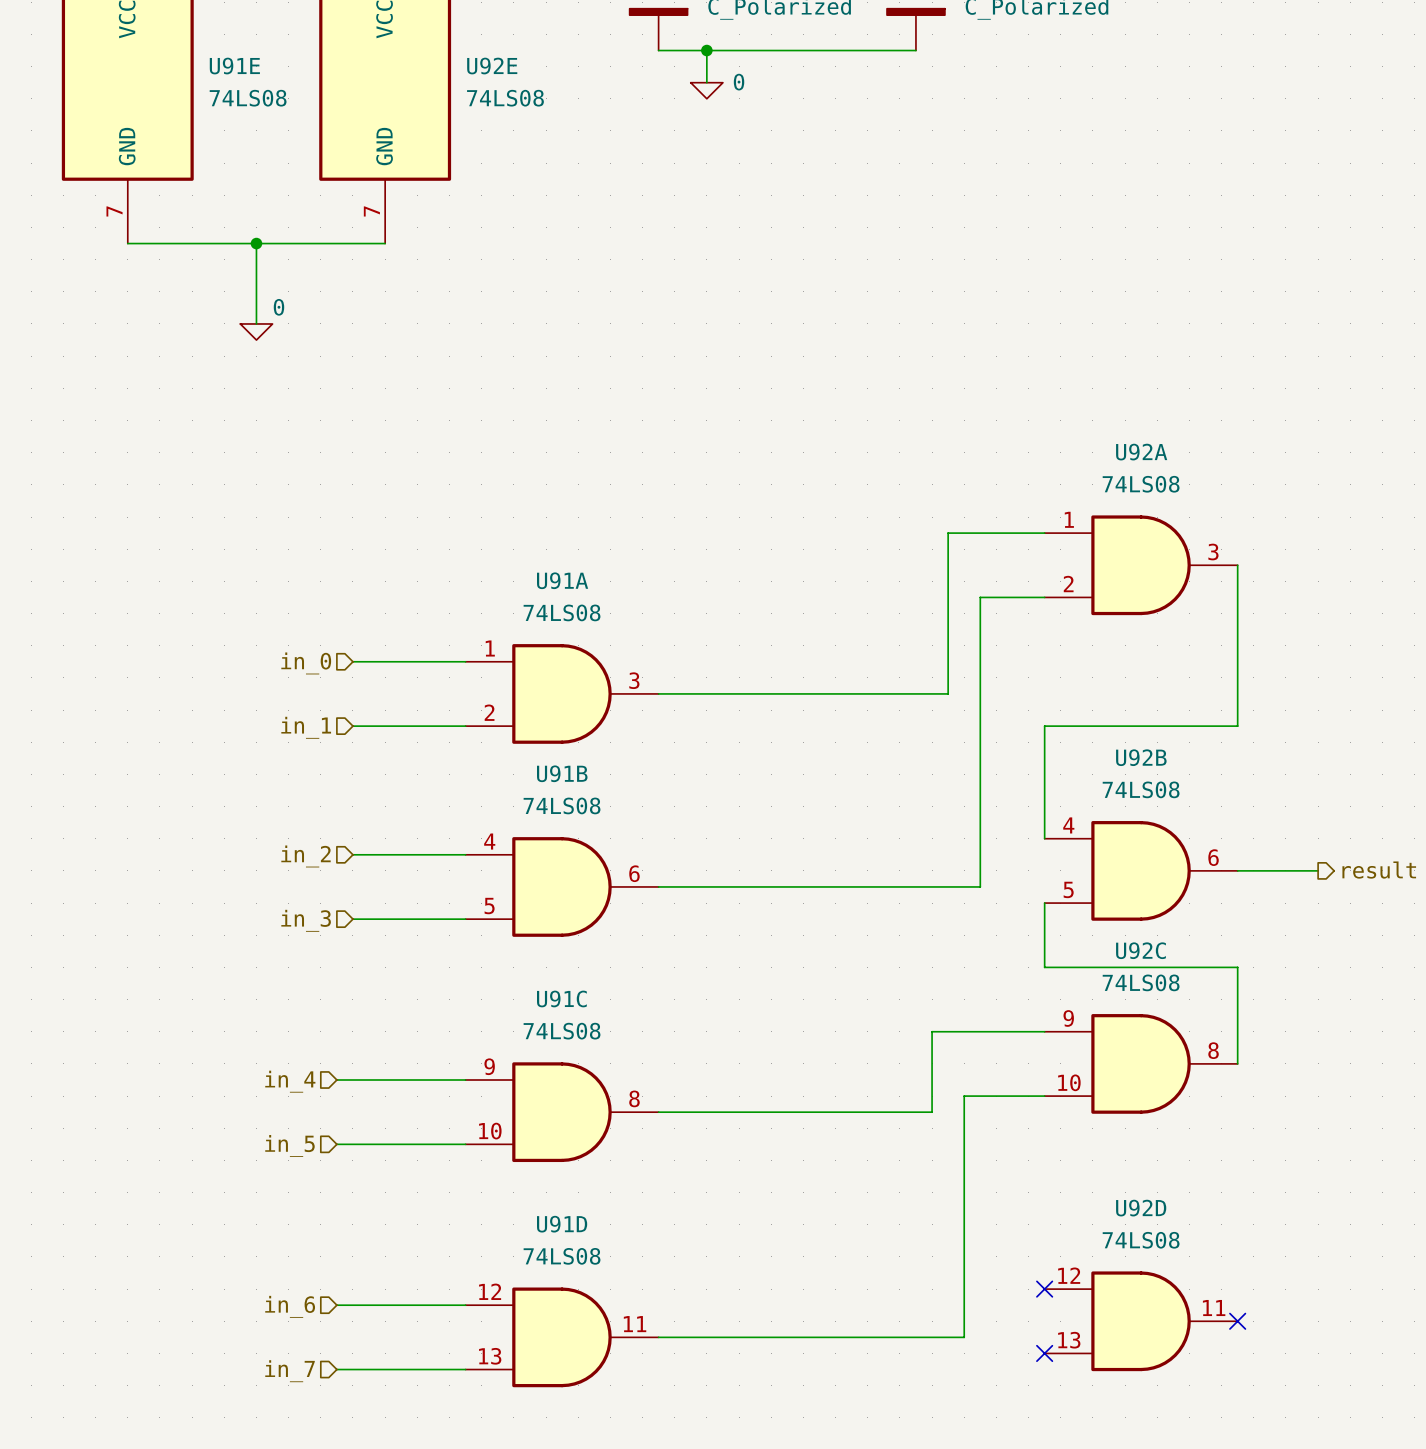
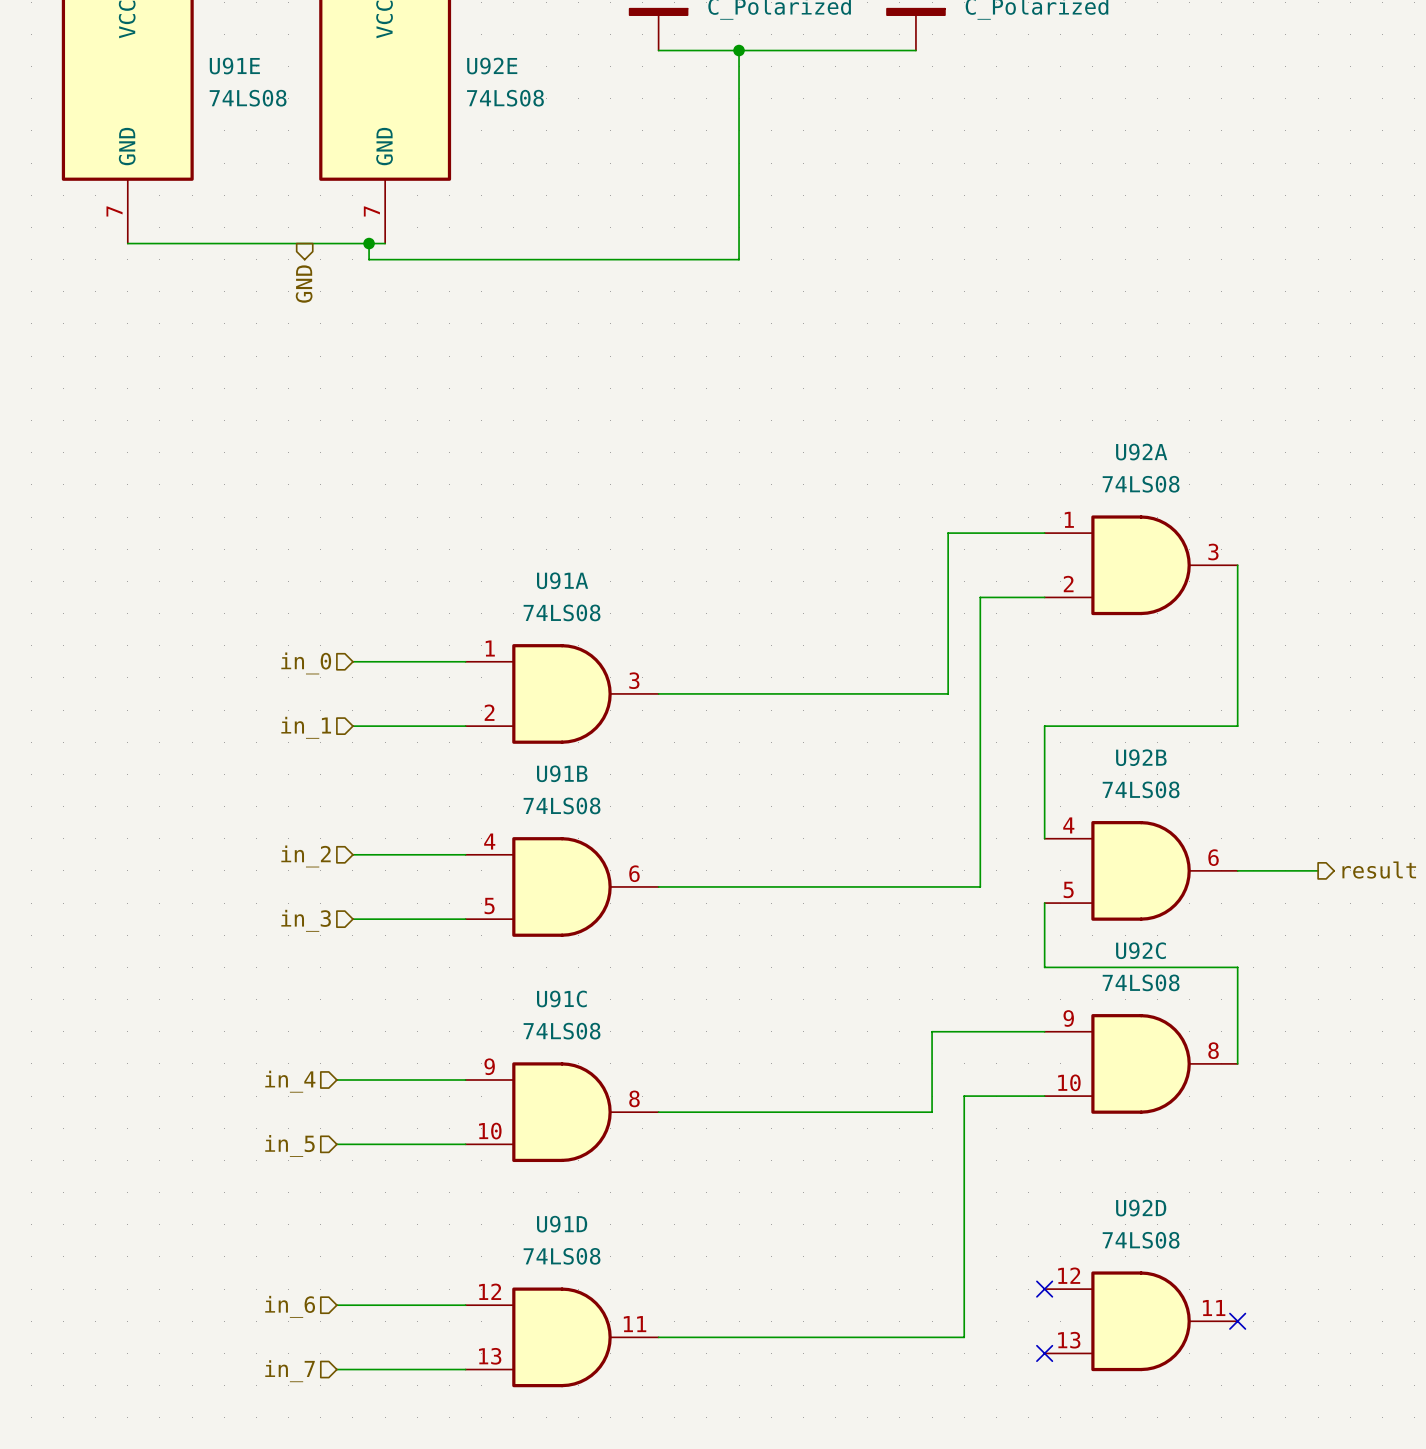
wire: (706, 50) (706, 82) -> none
junction position: (706, 50) -> (739, 50)
wire: none -> (739, 50) (739, 259) (369, 259) (369, 243)
power symbol: 0 (706, 90) -> none
wire: (256, 243) (256, 323) -> none
junction: (256, 243) -> none
junction: none -> (369, 243)
hierarchical label: none -> GND (304, 284)
power symbol: 0 (256, 332) -> none

